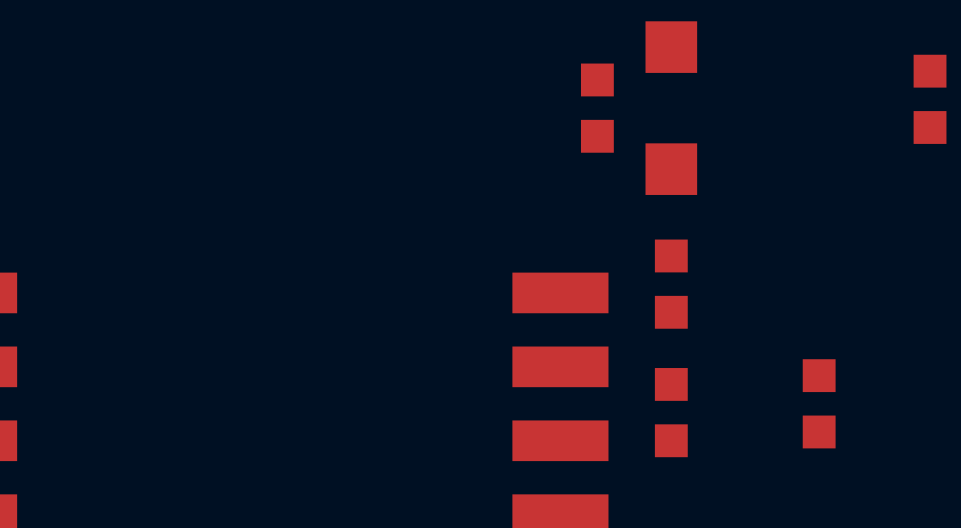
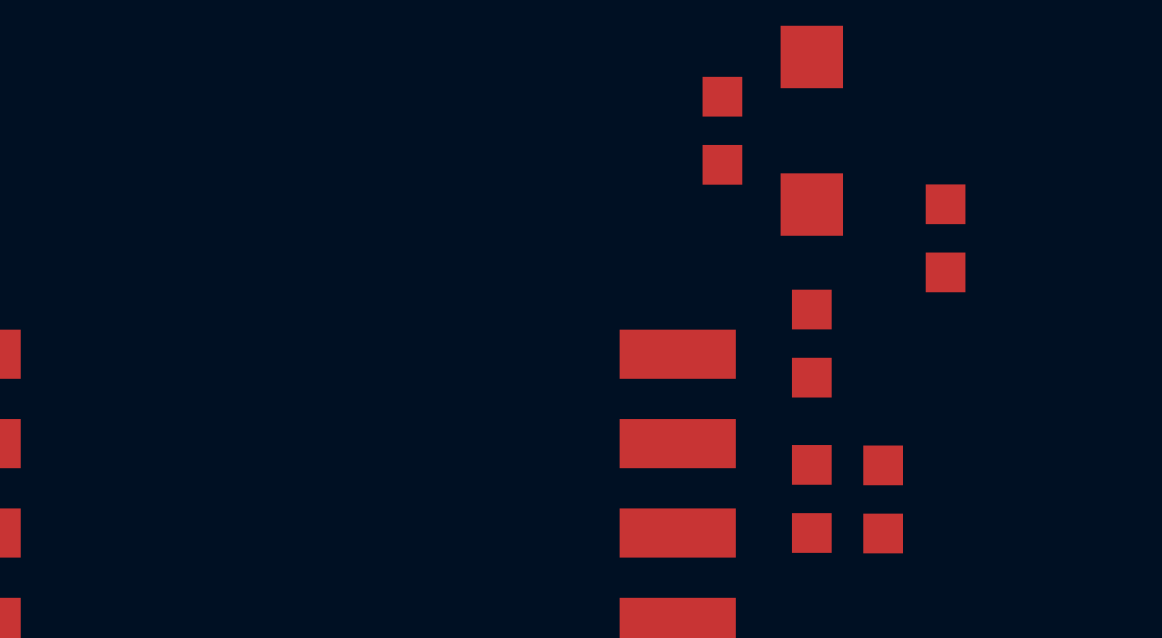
part: (930, 99) -> none
part: none -> (945, 238)
part position: (819, 403) -> (883, 499)

